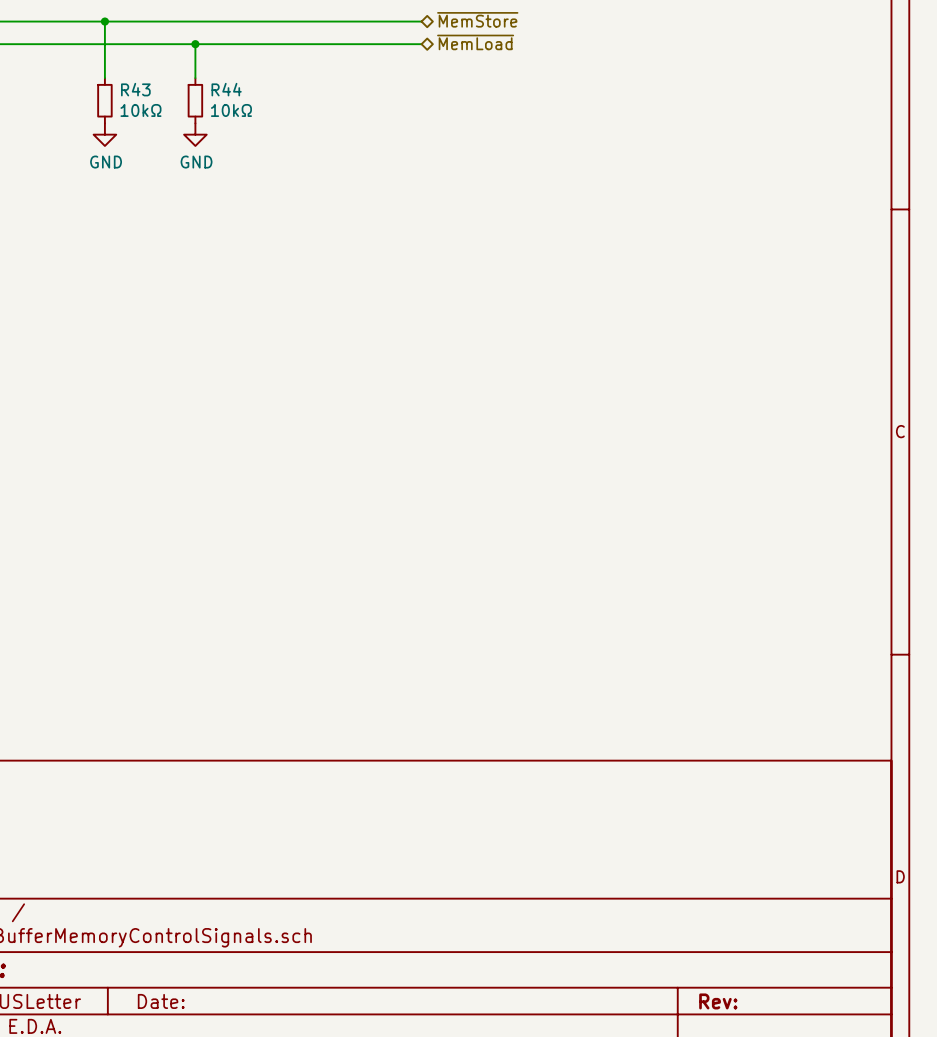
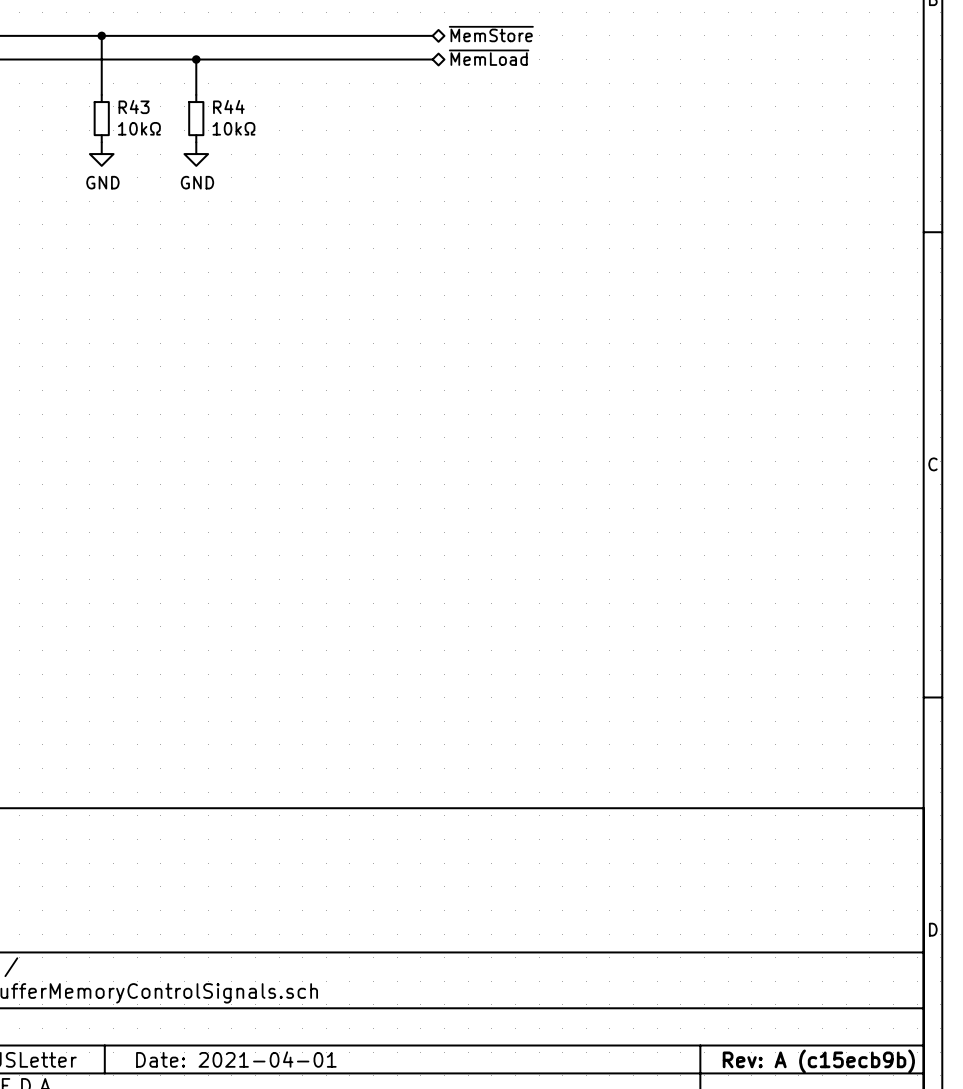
title block: Date: (161, 1001) -> Date: 2021-04-01 (236, 1059)
title block: Rev: (718, 1001) -> Rev: A (c15ecb9b) (818, 1061)

